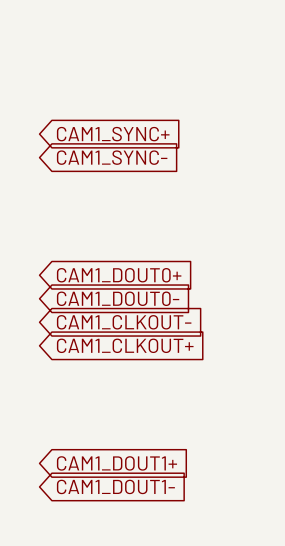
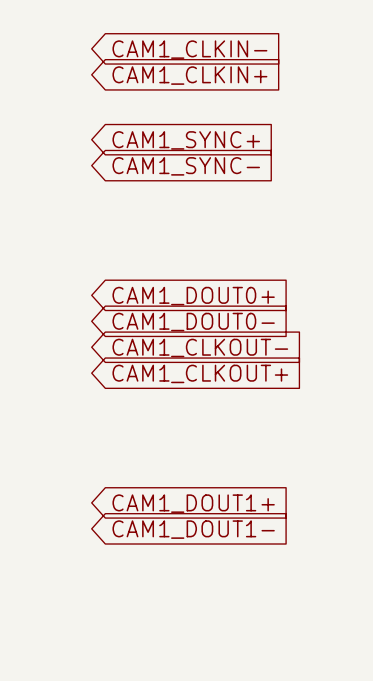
global label: none -> CAM1_CLKIN- (189, 49)
global label: none -> CAM1_CLKIN+ (189, 75)

